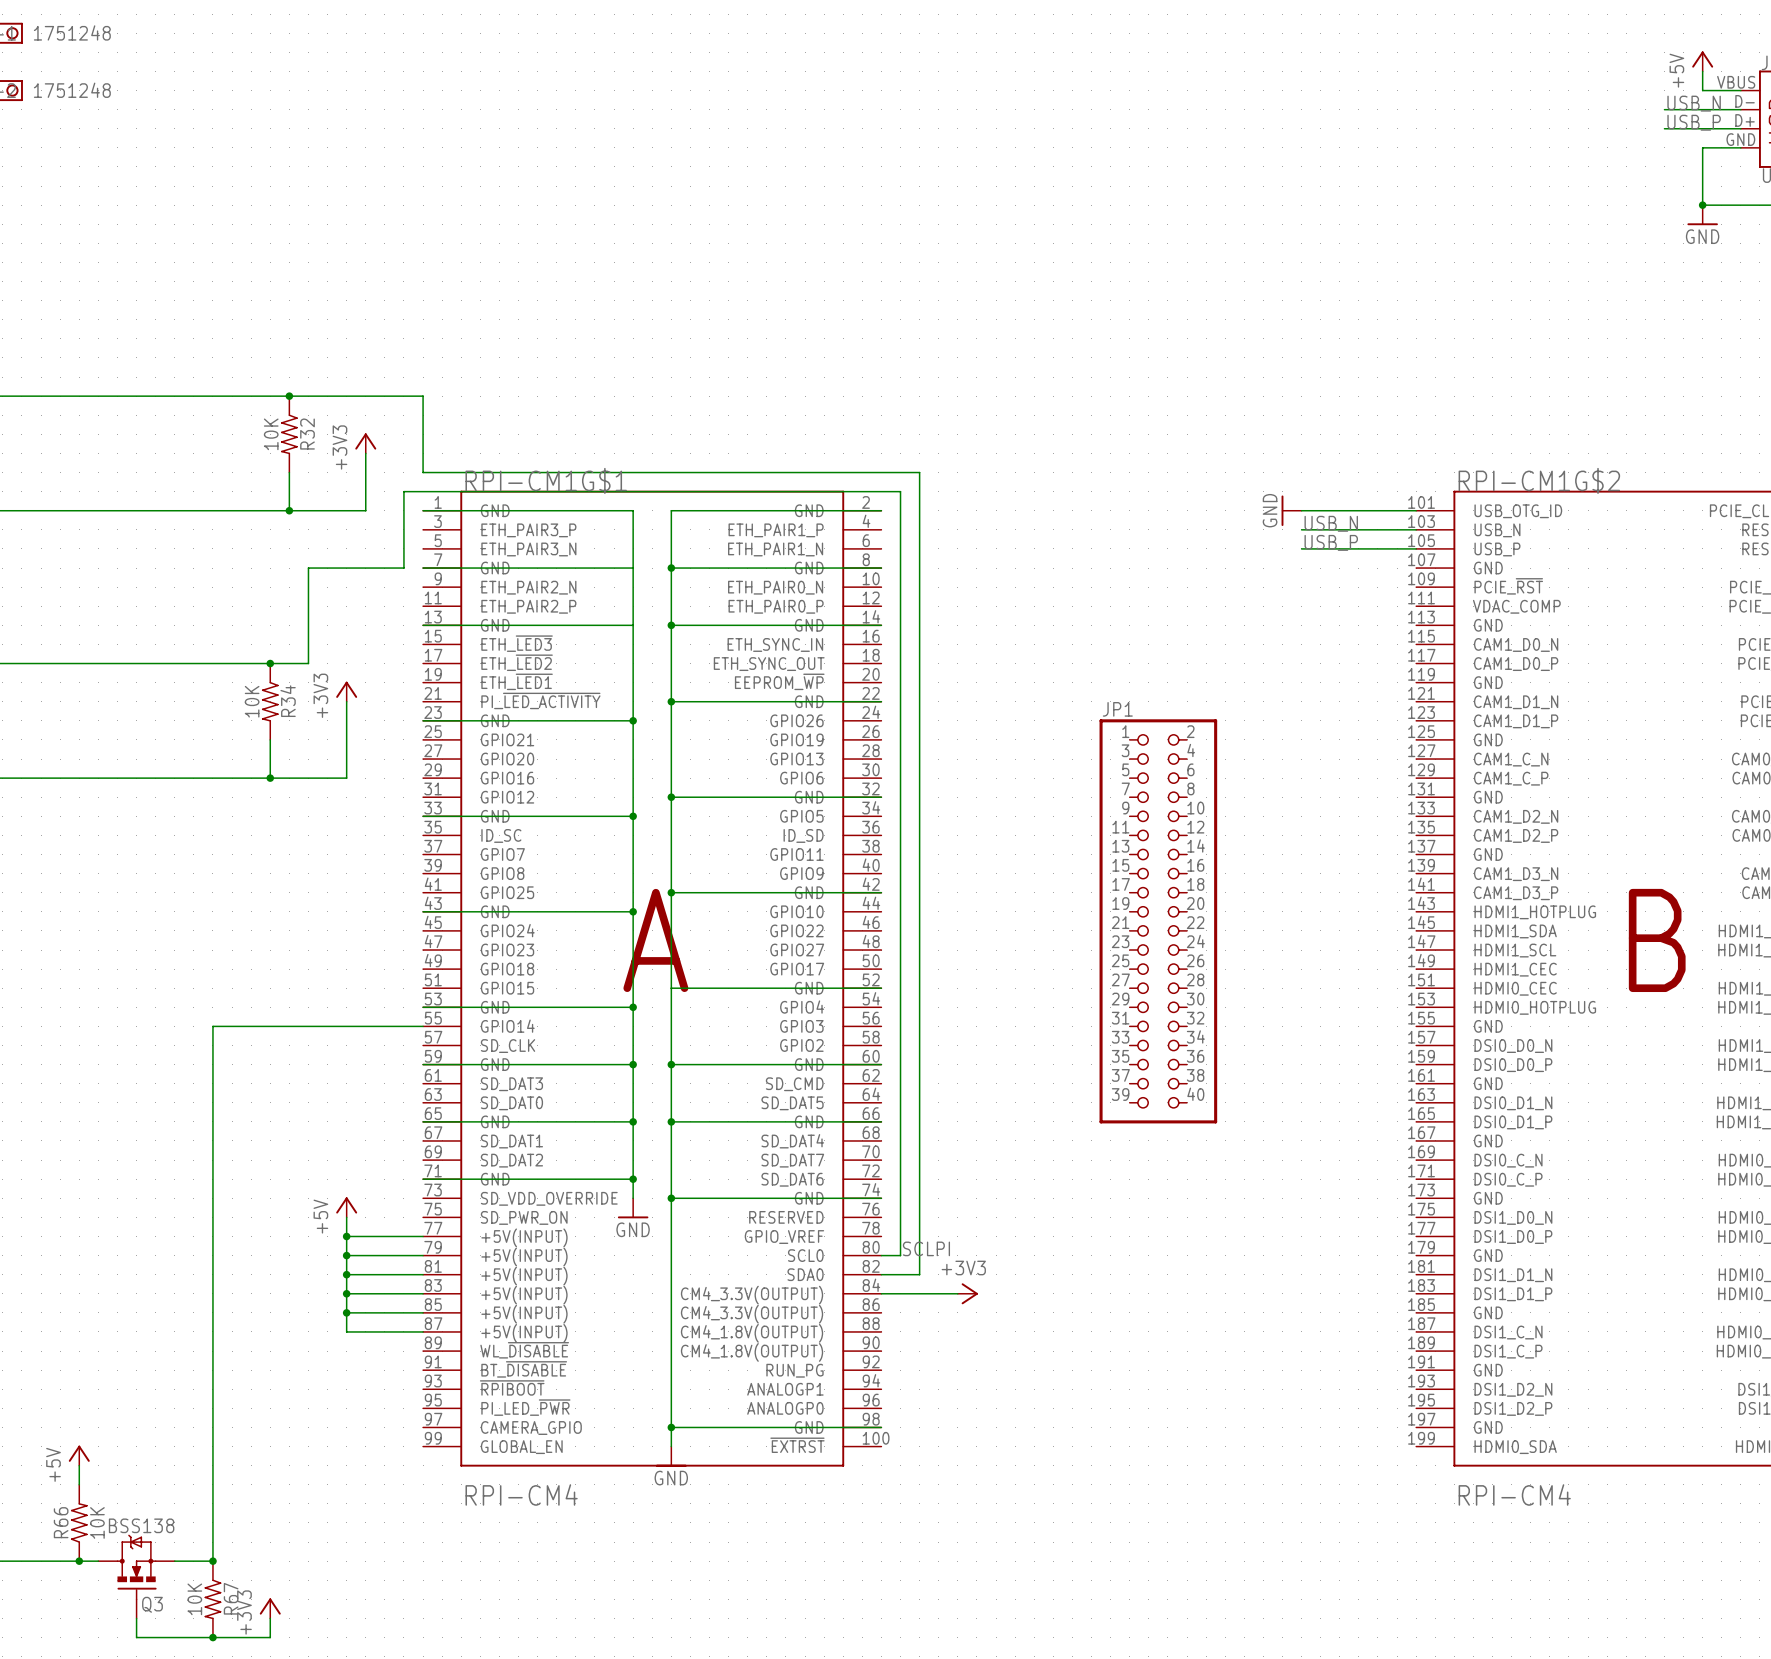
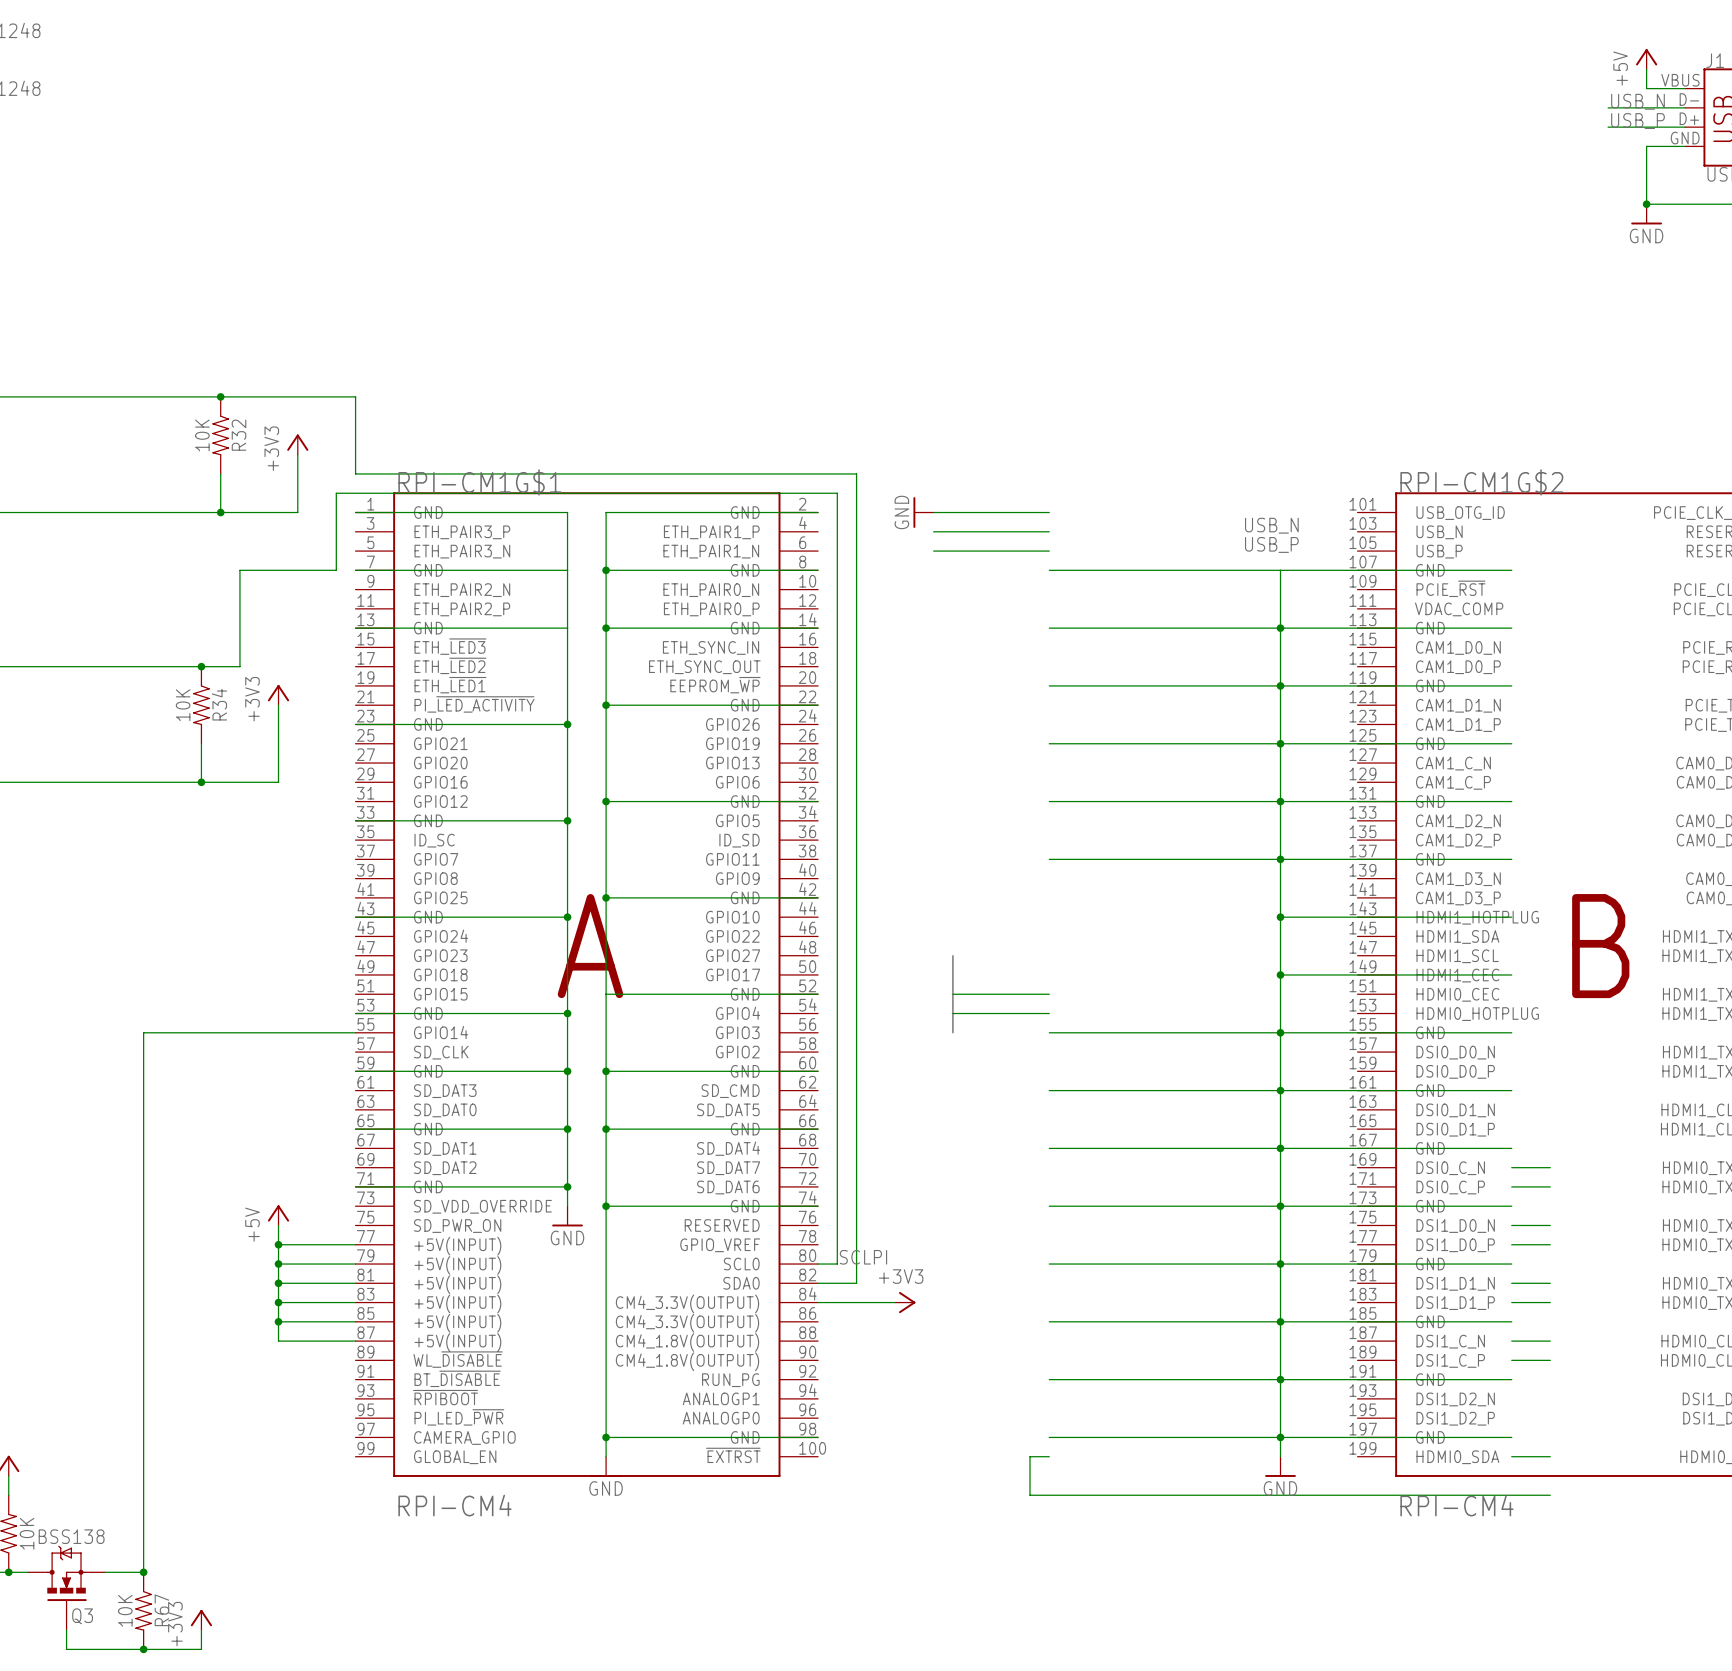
power symbol: none -> GND (923, 512)
wire: none -> (933, 512) (1049, 512)
power symbol: GND (1291, 510) -> none
wire: (1301, 510) (1416, 510) -> none
wire: none -> (933, 531) (1049, 531)
wire: (1301, 529) (1416, 529) -> none
wire: none -> (933, 551) (1049, 551)
wire: (1301, 548) (1416, 548) -> none
wire: none -> (1049, 570) (1511, 570)
wire: none -> (1280, 570) (1280, 1456)
wire: none -> (1049, 628) (1511, 628)
junction: none -> (1280, 628)
wire: none -> (1049, 685) (1511, 685)
junction: none -> (1280, 685)
wire: none -> (1049, 743) (1511, 743)
junction: none -> (1280, 743)
wire: none -> (1049, 801) (1511, 801)
junction: none -> (1280, 801)
wire: none -> (1049, 859) (1511, 859)
junction: none -> (1280, 859)
wire: none -> (1280, 917) (1511, 917)
junction: none -> (1280, 917)
JP1: (1158, 921) -> none
bus: none -> (952, 955) (952, 1032)
wire: none -> (1280, 974) (1511, 974)
junction: none -> (1280, 974)
wire: none -> (952, 994) (1049, 994)
wire: none -> (952, 1013) (1049, 1013)
wire: none -> (1049, 1032) (1511, 1032)
junction: none -> (1280, 1032)
wire: none -> (1049, 1090) (1511, 1090)
junction: none -> (1280, 1090)
wire: none -> (1049, 1148) (1511, 1148)
junction: none -> (1280, 1148)
wire: none -> (1511, 1167) (1550, 1167)
wire: none -> (1511, 1186) (1550, 1186)
wire: none -> (1049, 1206) (1511, 1206)
junction: none -> (1280, 1206)
wire: none -> (1511, 1225) (1550, 1225)
wire: none -> (1511, 1244) (1550, 1244)
wire: none -> (1049, 1264) (1511, 1264)
junction: none -> (1280, 1264)
wire: none -> (1511, 1283) (1550, 1283)
wire: none -> (1511, 1302) (1550, 1302)
wire: none -> (1049, 1321) (1511, 1321)
junction: none -> (1280, 1321)
wire: none -> (1511, 1341) (1550, 1341)
wire: none -> (1511, 1360) (1550, 1360)
wire: none -> (1049, 1379) (1511, 1379)
junction: none -> (1280, 1379)
wire: none -> (1049, 1437) (1511, 1437)
junction: none -> (1280, 1437)
wire: none -> (1049, 1456) (1030, 1456) (1030, 1495) (1550, 1495)
wire: none -> (1511, 1456) (1550, 1456)
power symbol: none -> GND (1280, 1466)

